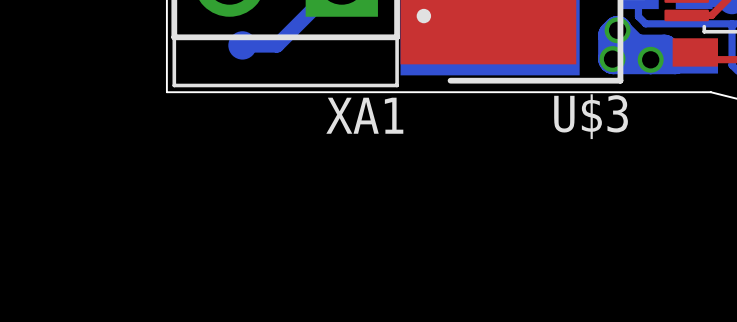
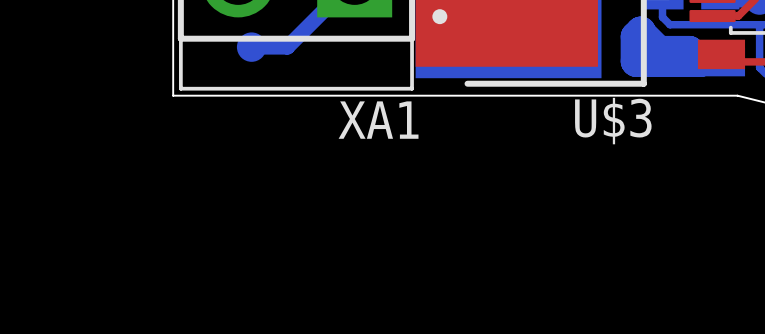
via: (617, 30) -> none
via: (612, 59) -> none
via: (650, 59) -> none

